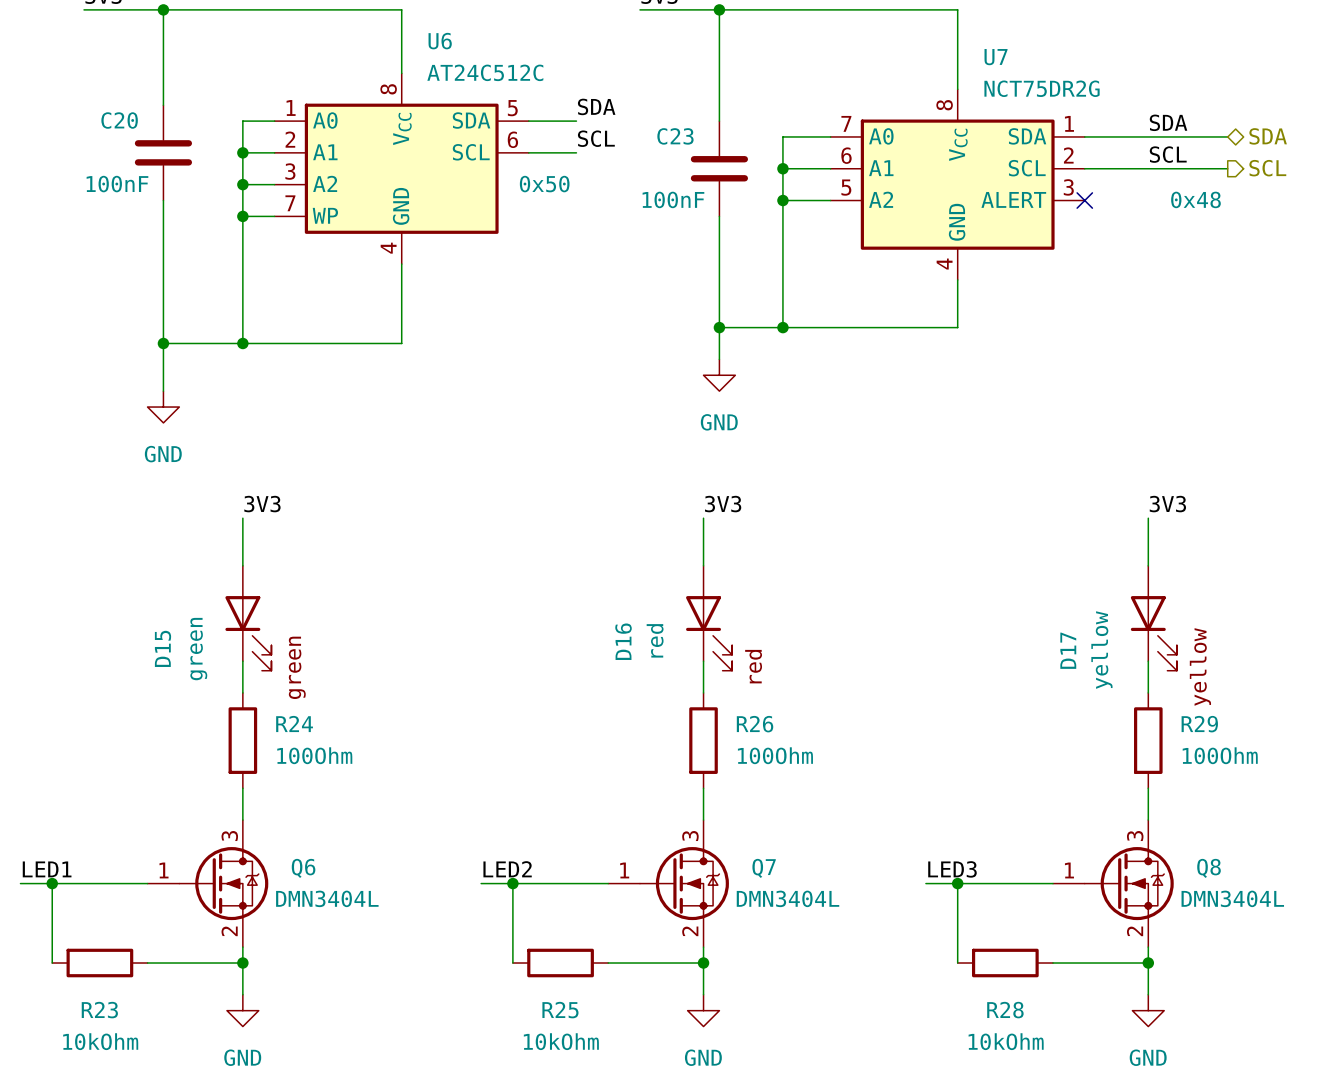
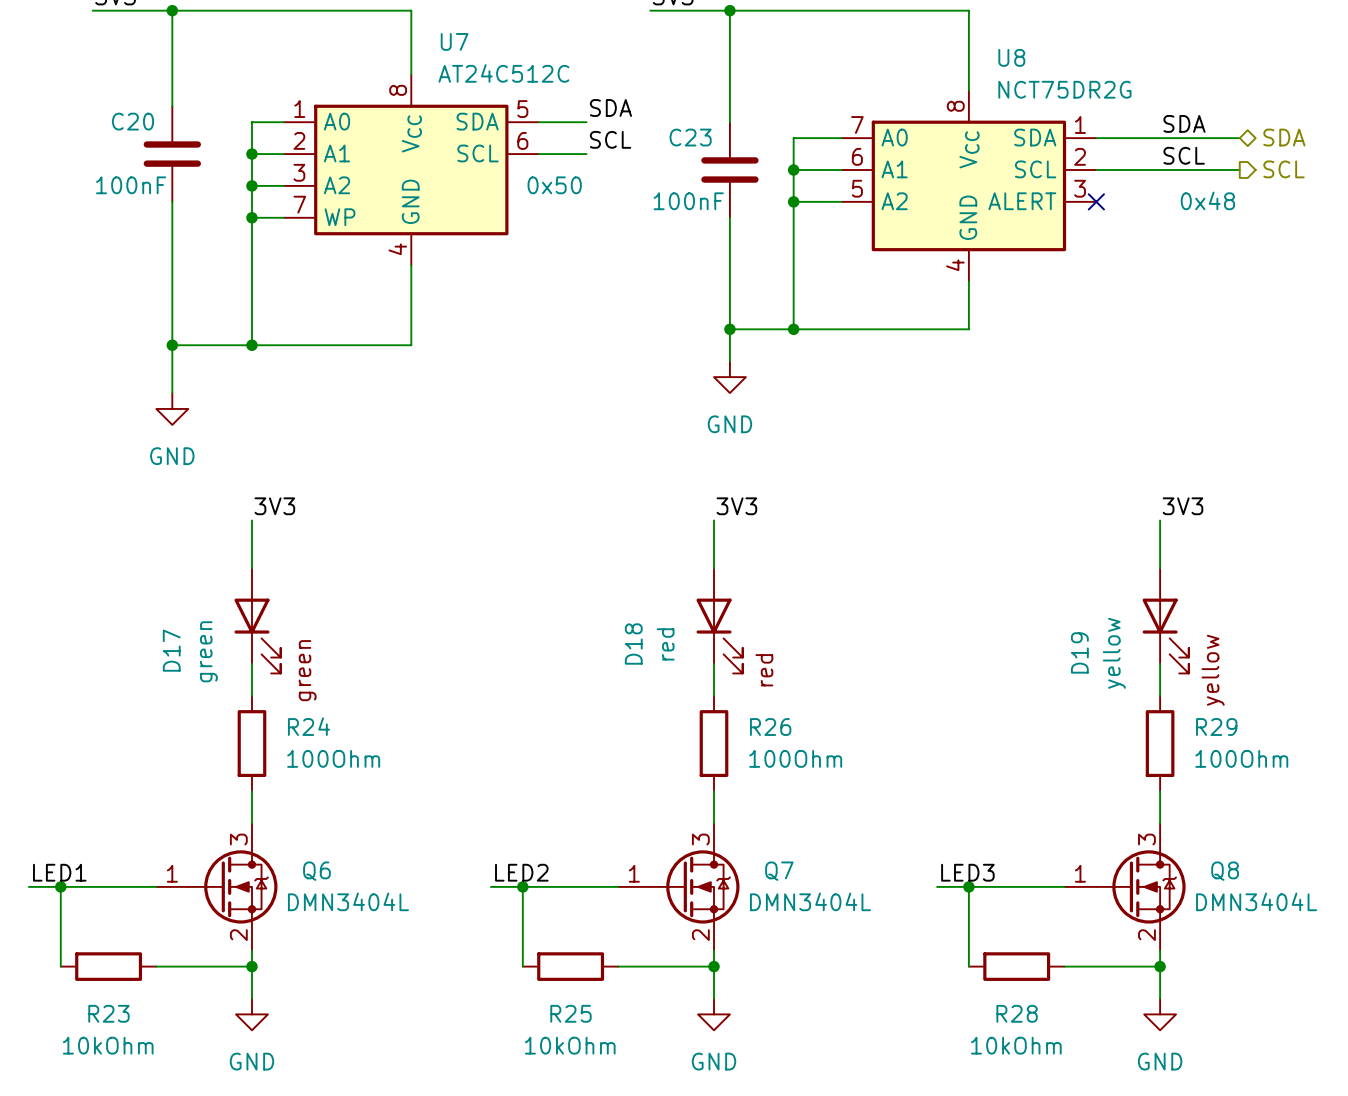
U6 name: U6 (440, 41) -> U7 (454, 41)
U7 name: U7 (996, 57) -> U8 (1011, 57)
D16 name: D16 (623, 641) -> D18 (633, 644)
D15 name: D15 (163, 648) -> D17 (171, 650)
D17 name: D17 (1068, 650) -> D19 (1079, 652)

